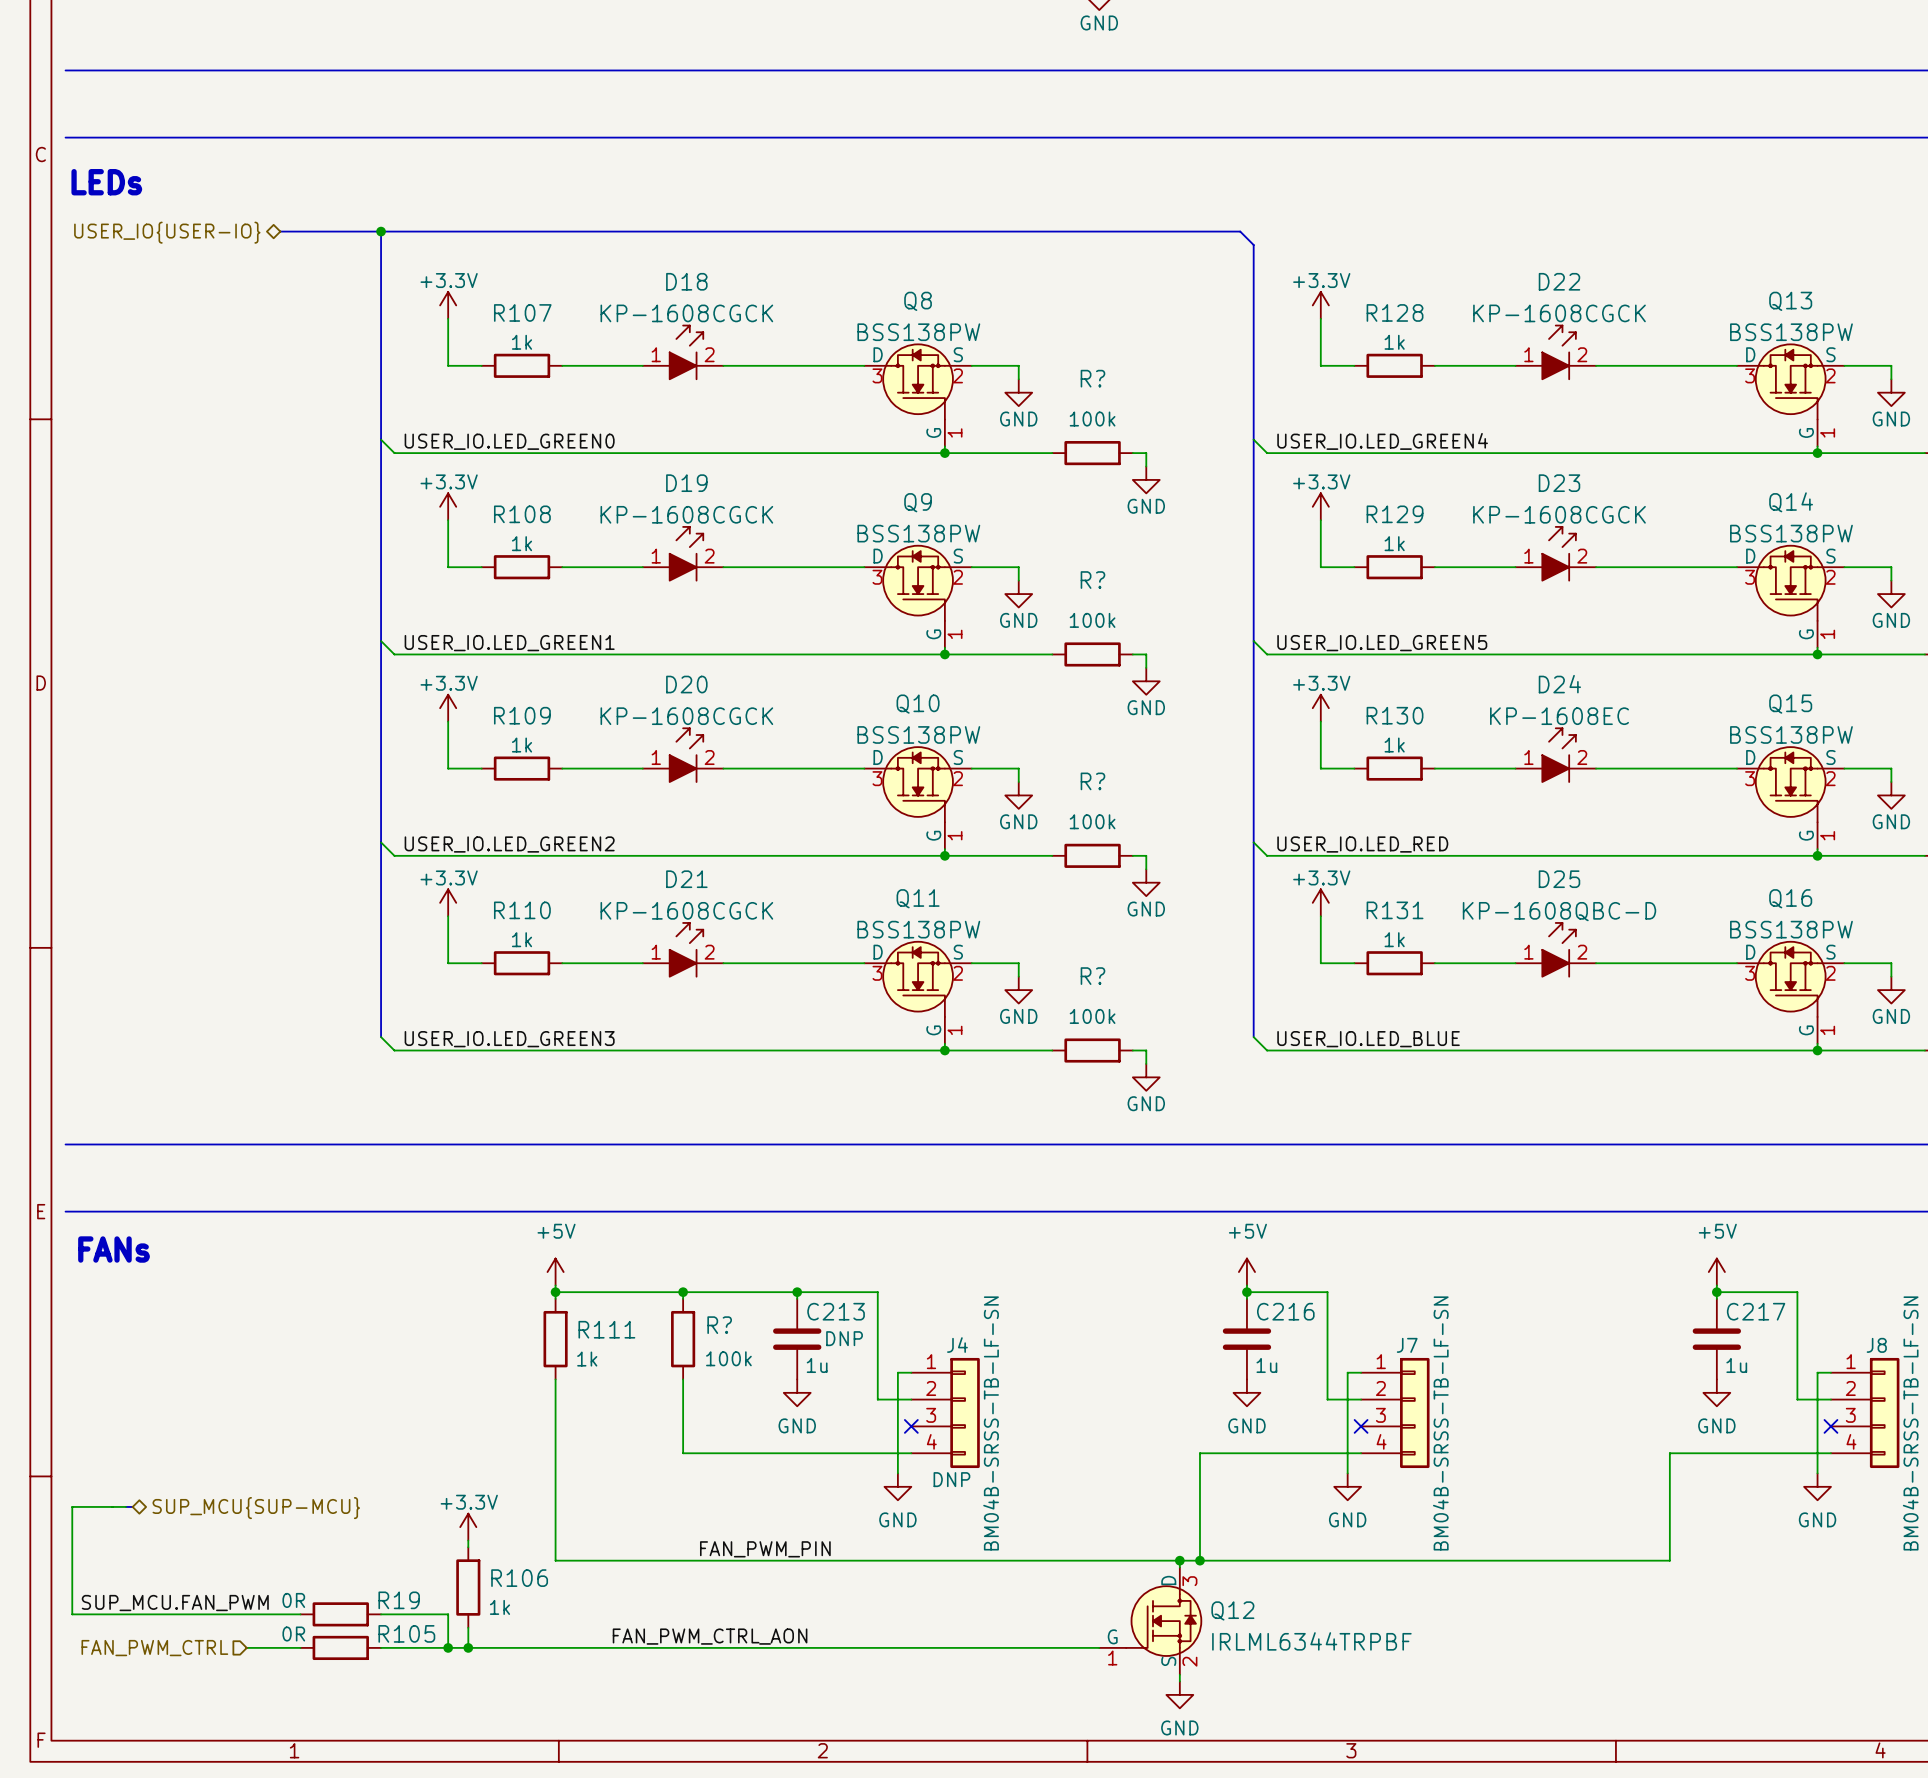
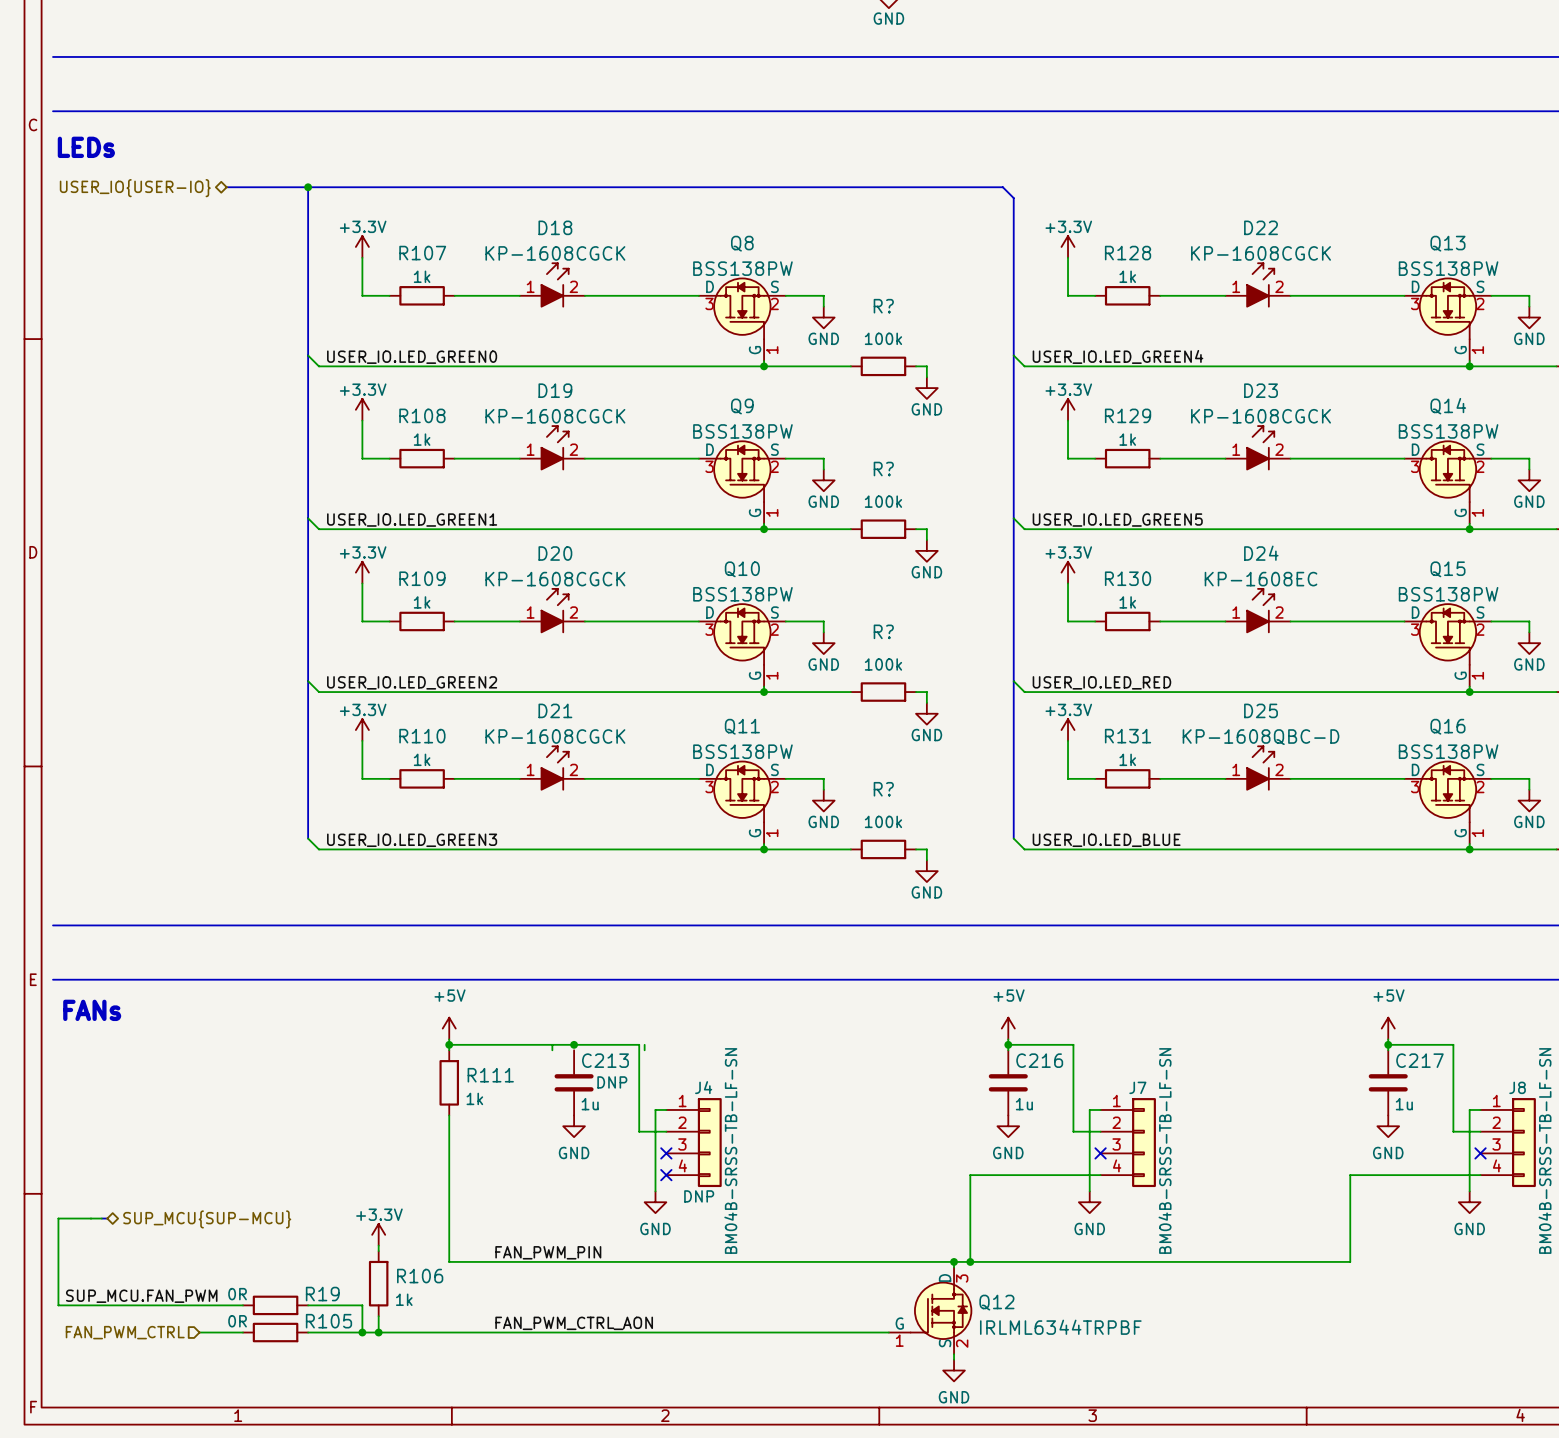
junction position: (683, 1292) -> (574, 1044)
wire: (790, 1292) (877, 1292) (877, 1399) (911, 1399) -> (639, 1044) (639, 1131) (666, 1131)
junction: (797, 1292) -> none
R?: (683, 1339) -> none
C213 position: (797, 1339) -> (574, 1082)
wire: (911, 1372) (897, 1372) (897, 1473) -> (666, 1109) (655, 1109) (655, 1191)
wire: (683, 1379) (683, 1453) (911, 1453) -> none
power symbol: none -> GND (574, 1126)
power symbol: GND (797, 1392) -> none
J4 position: (945, 1412) -> (694, 1142)
no-connect mark: none -> (666, 1153)
no-connect mark: (911, 1426) -> none
no-connect mark: none -> (666, 1175)
power symbol: none -> GND (655, 1202)
power symbol: GND (897, 1486) -> none
label position: FAN_PWM_PIN (765, 1549) -> FAN_PWM_PIN (548, 1252)

